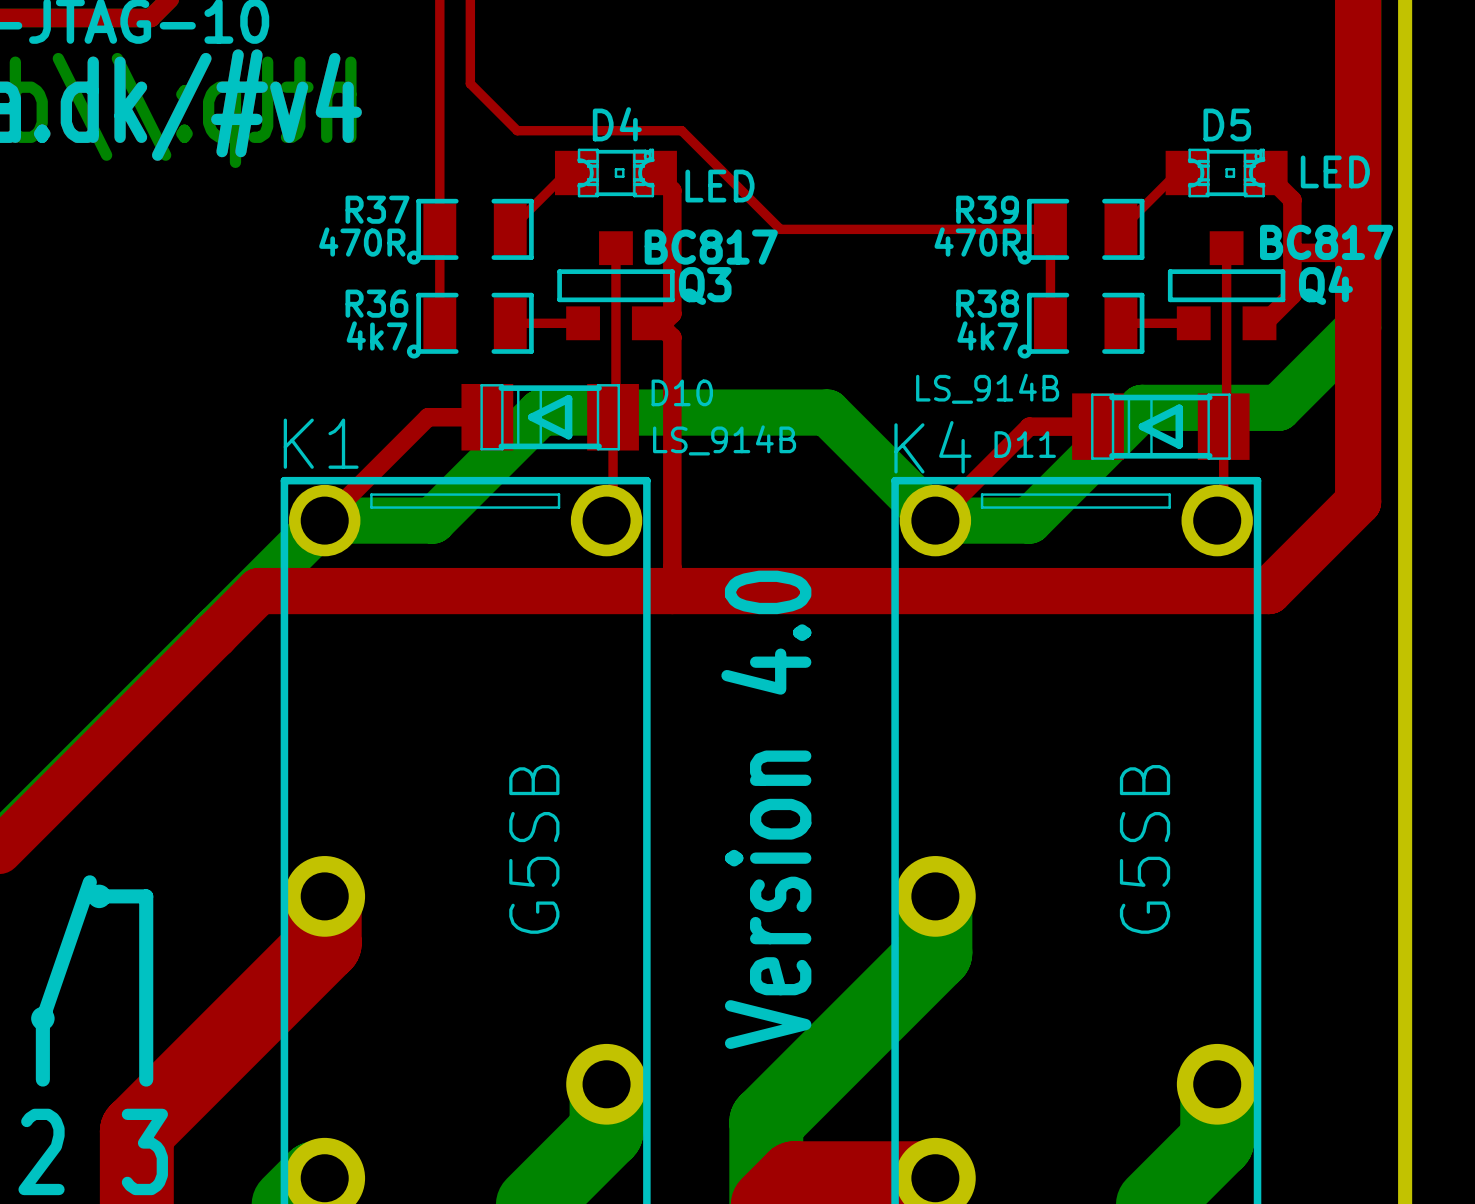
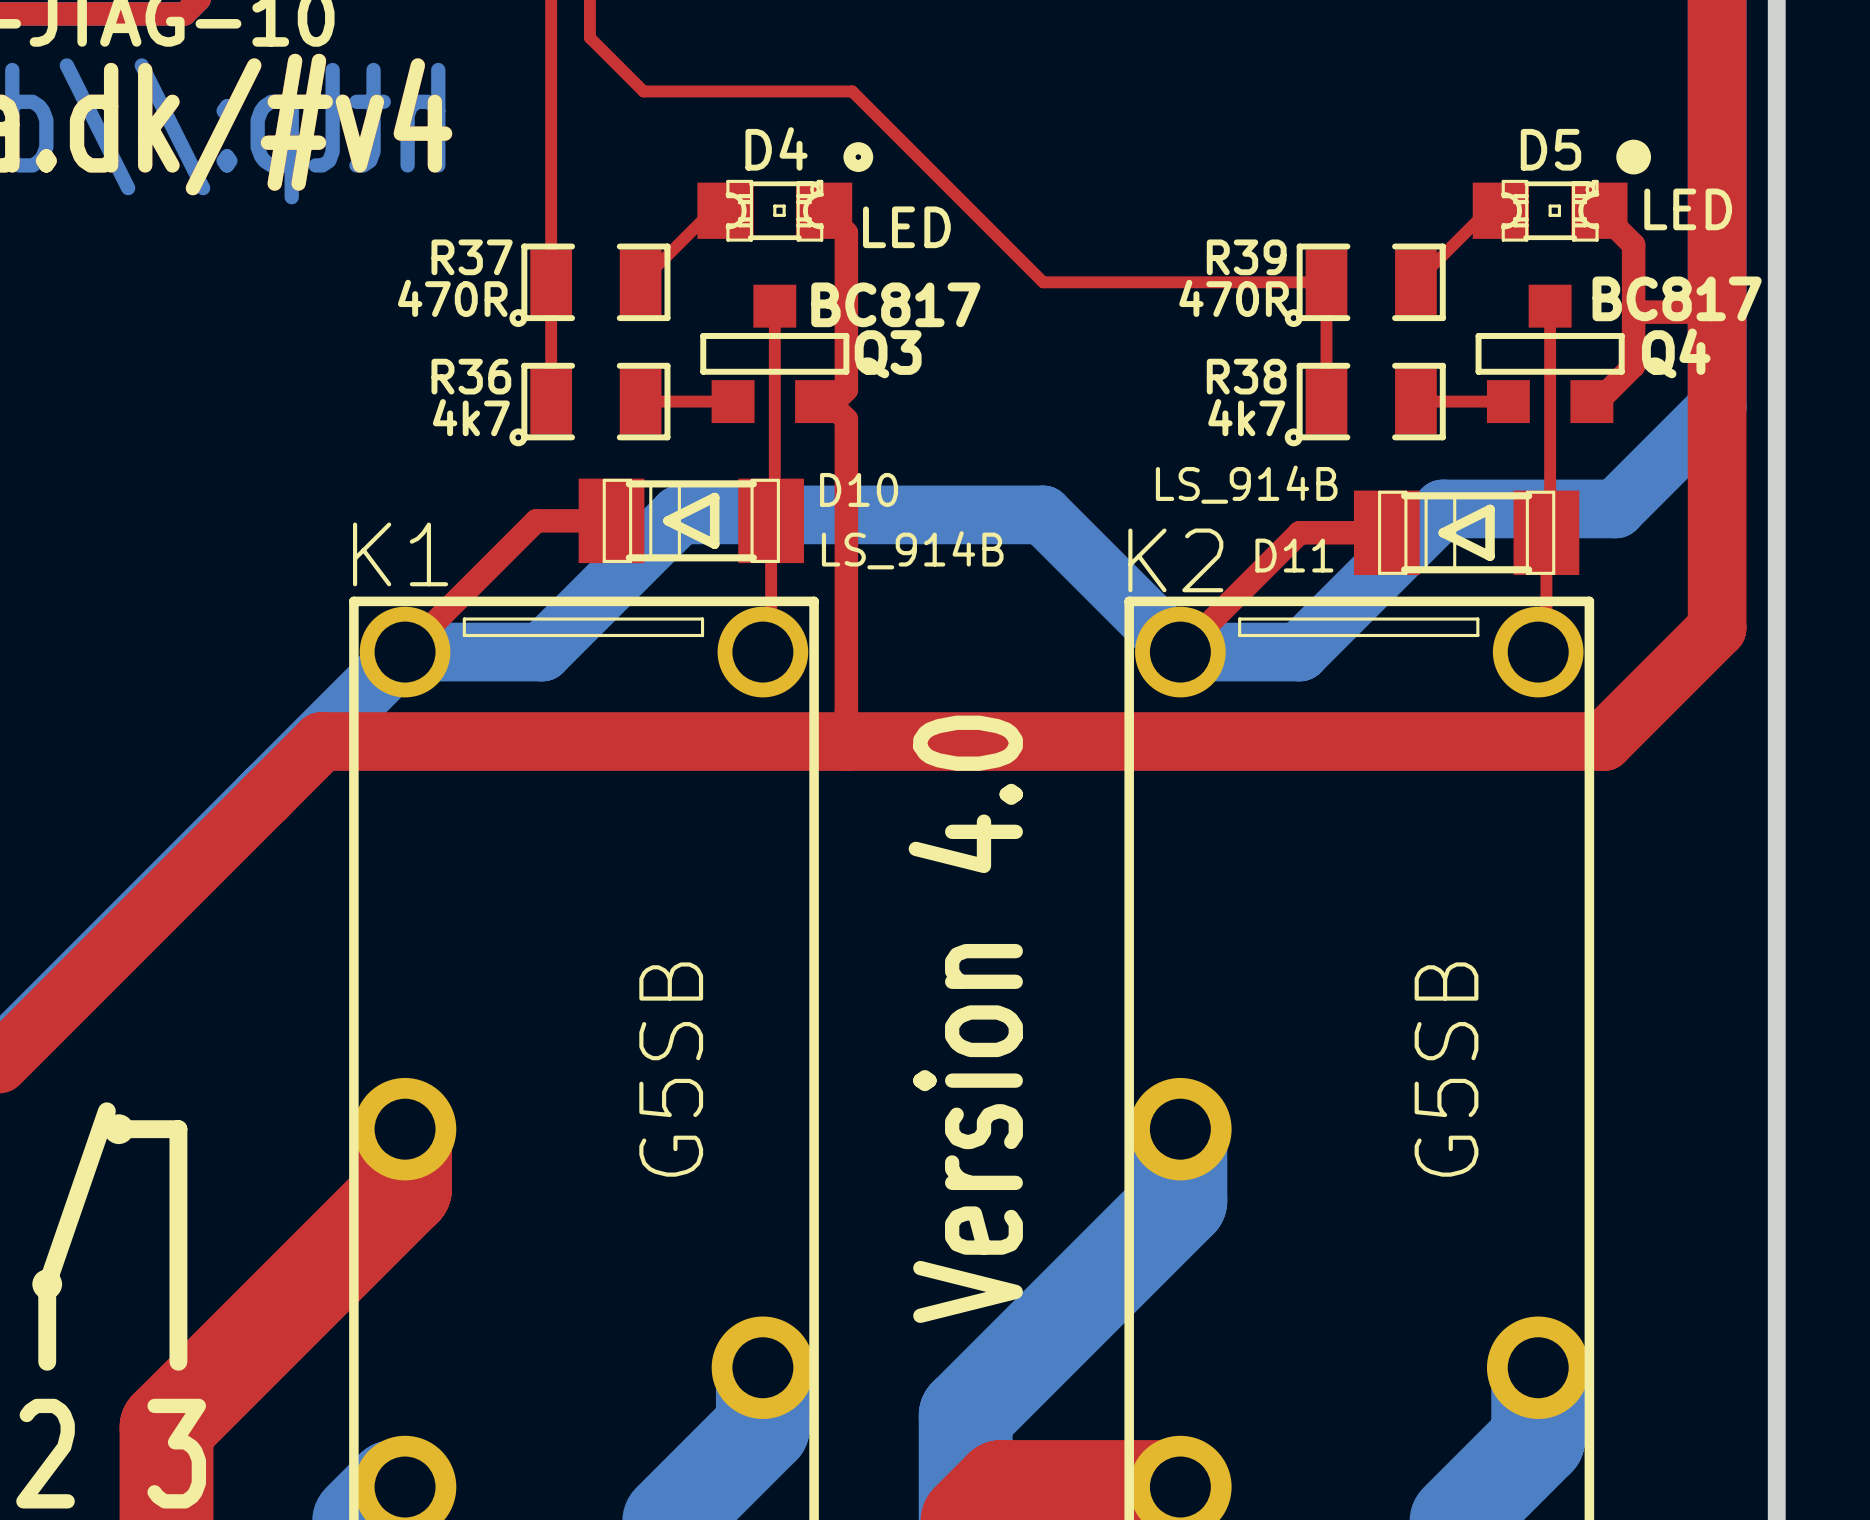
top track: (470, 36) (470, 83) (517, 130) (681, 130) (780, 229) (827, 229) -> (589, 37) (643, 91) (852, 91) (1043, 282)
drawing: none -> [1616, 139, 1652, 175]
drawing: none -> [843, 142, 874, 172]
K4 name: K4 (932, 447) -> K2 (1175, 560)

